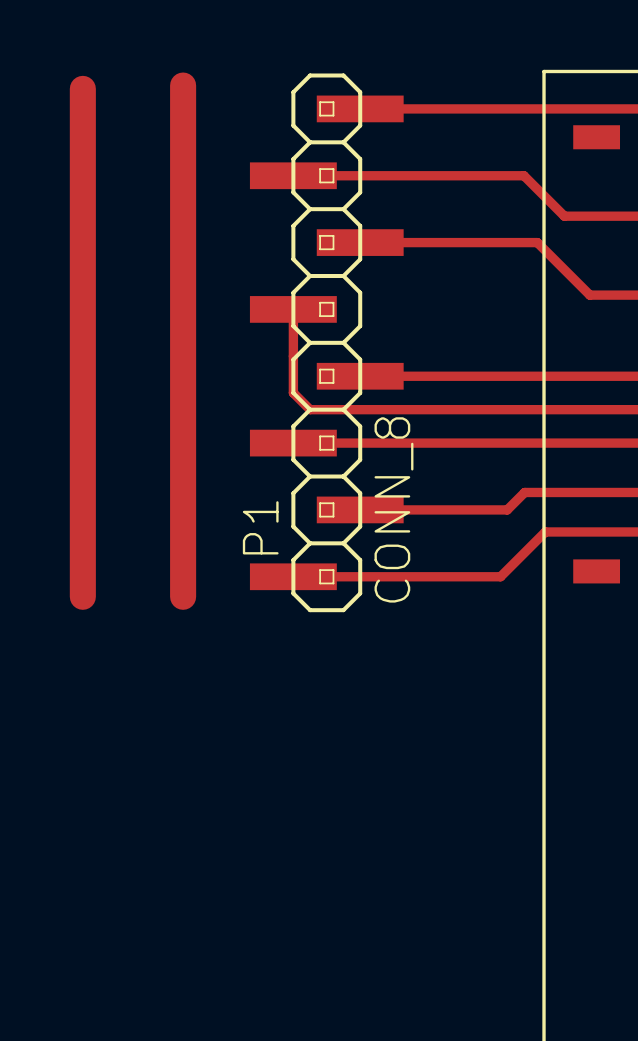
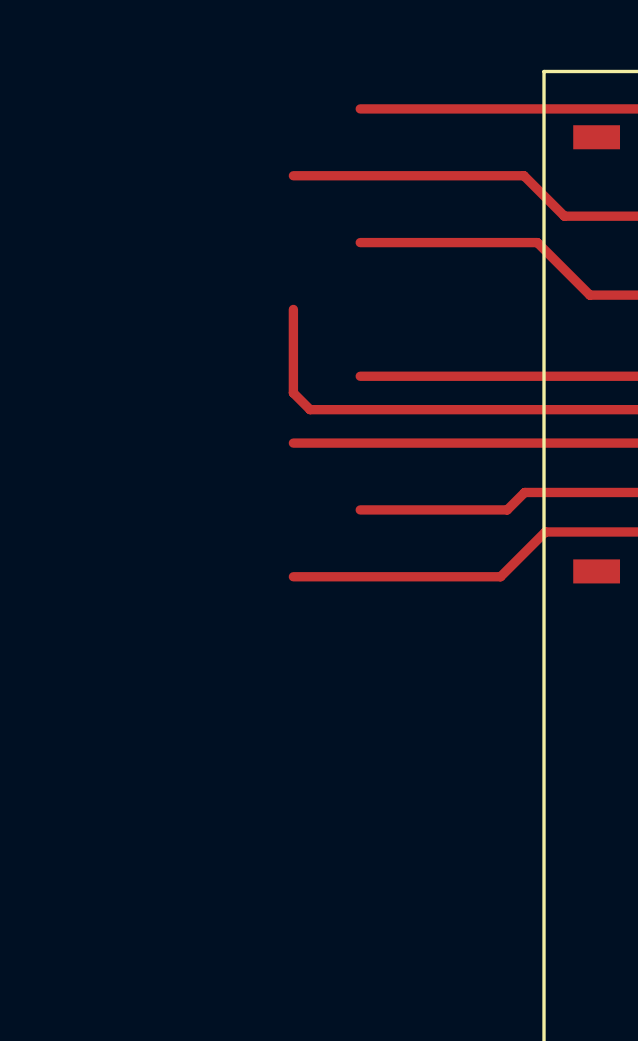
track: (183, 85) (183, 596) -> none
track: (82, 88) (82, 596) -> none
P1: CONN_8 (326, 342) -> none

